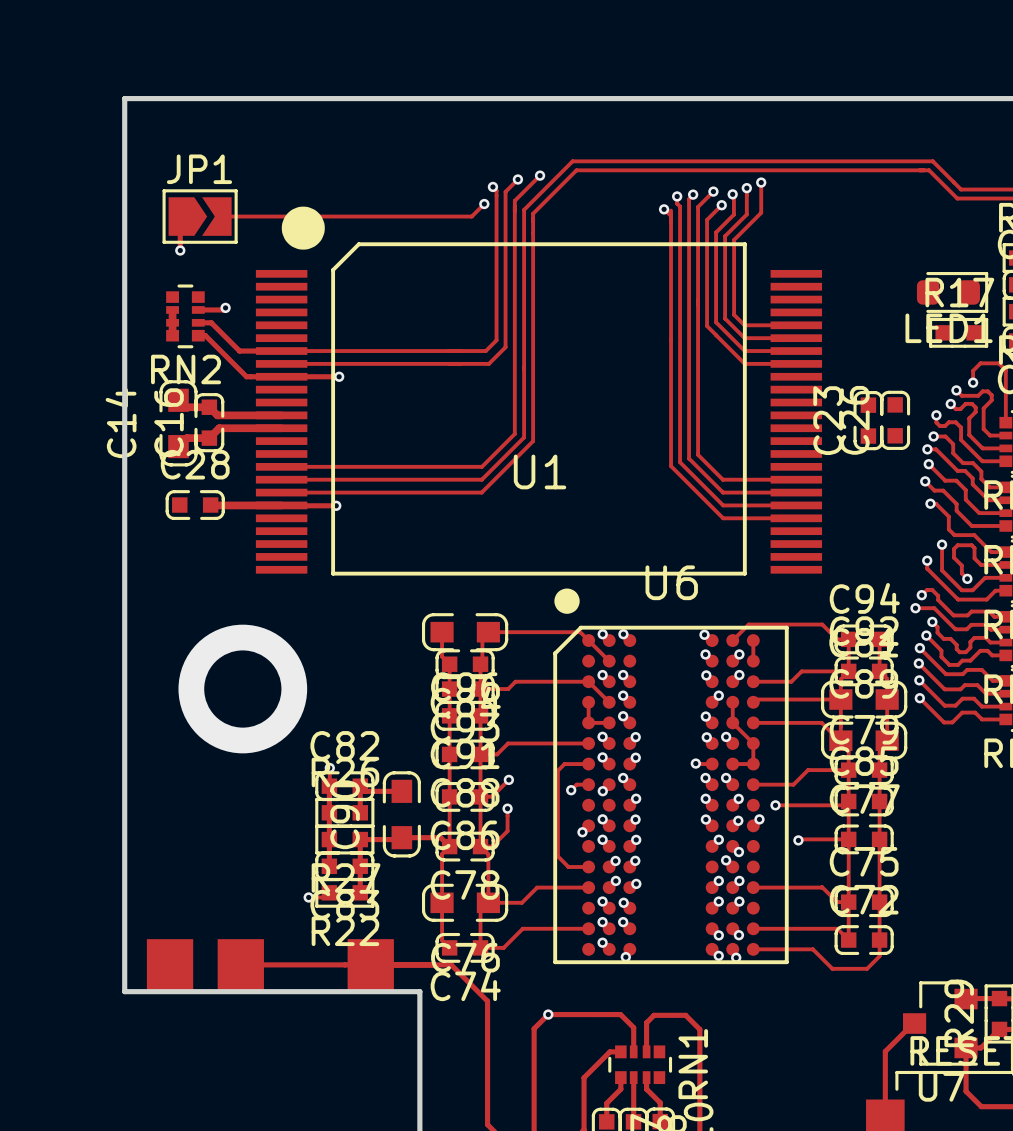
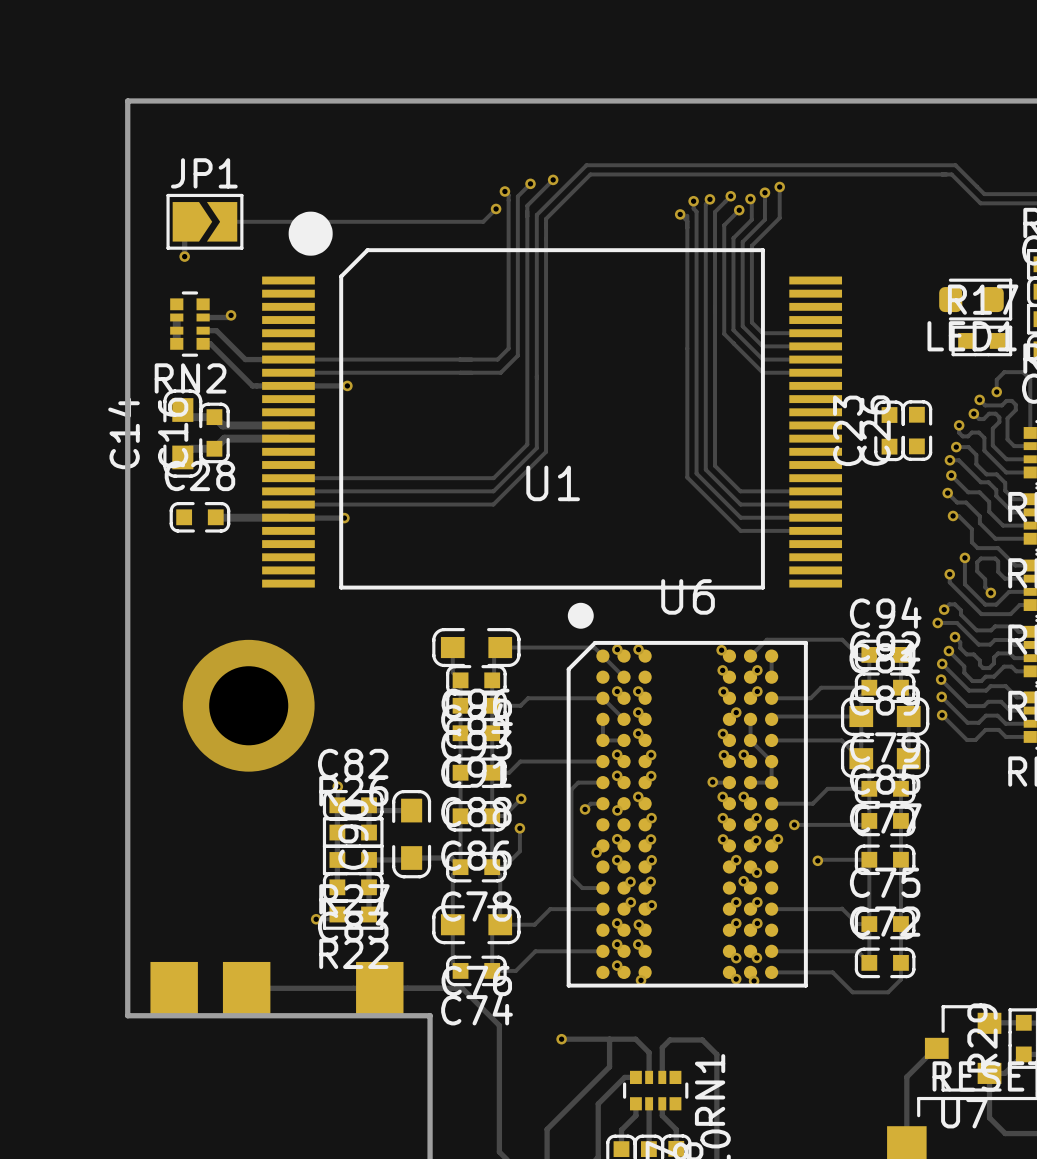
track: (548, 1014) (534, 1028) (534, 1102) -> (609, 1039) (609, 1066) (547, 1129)

